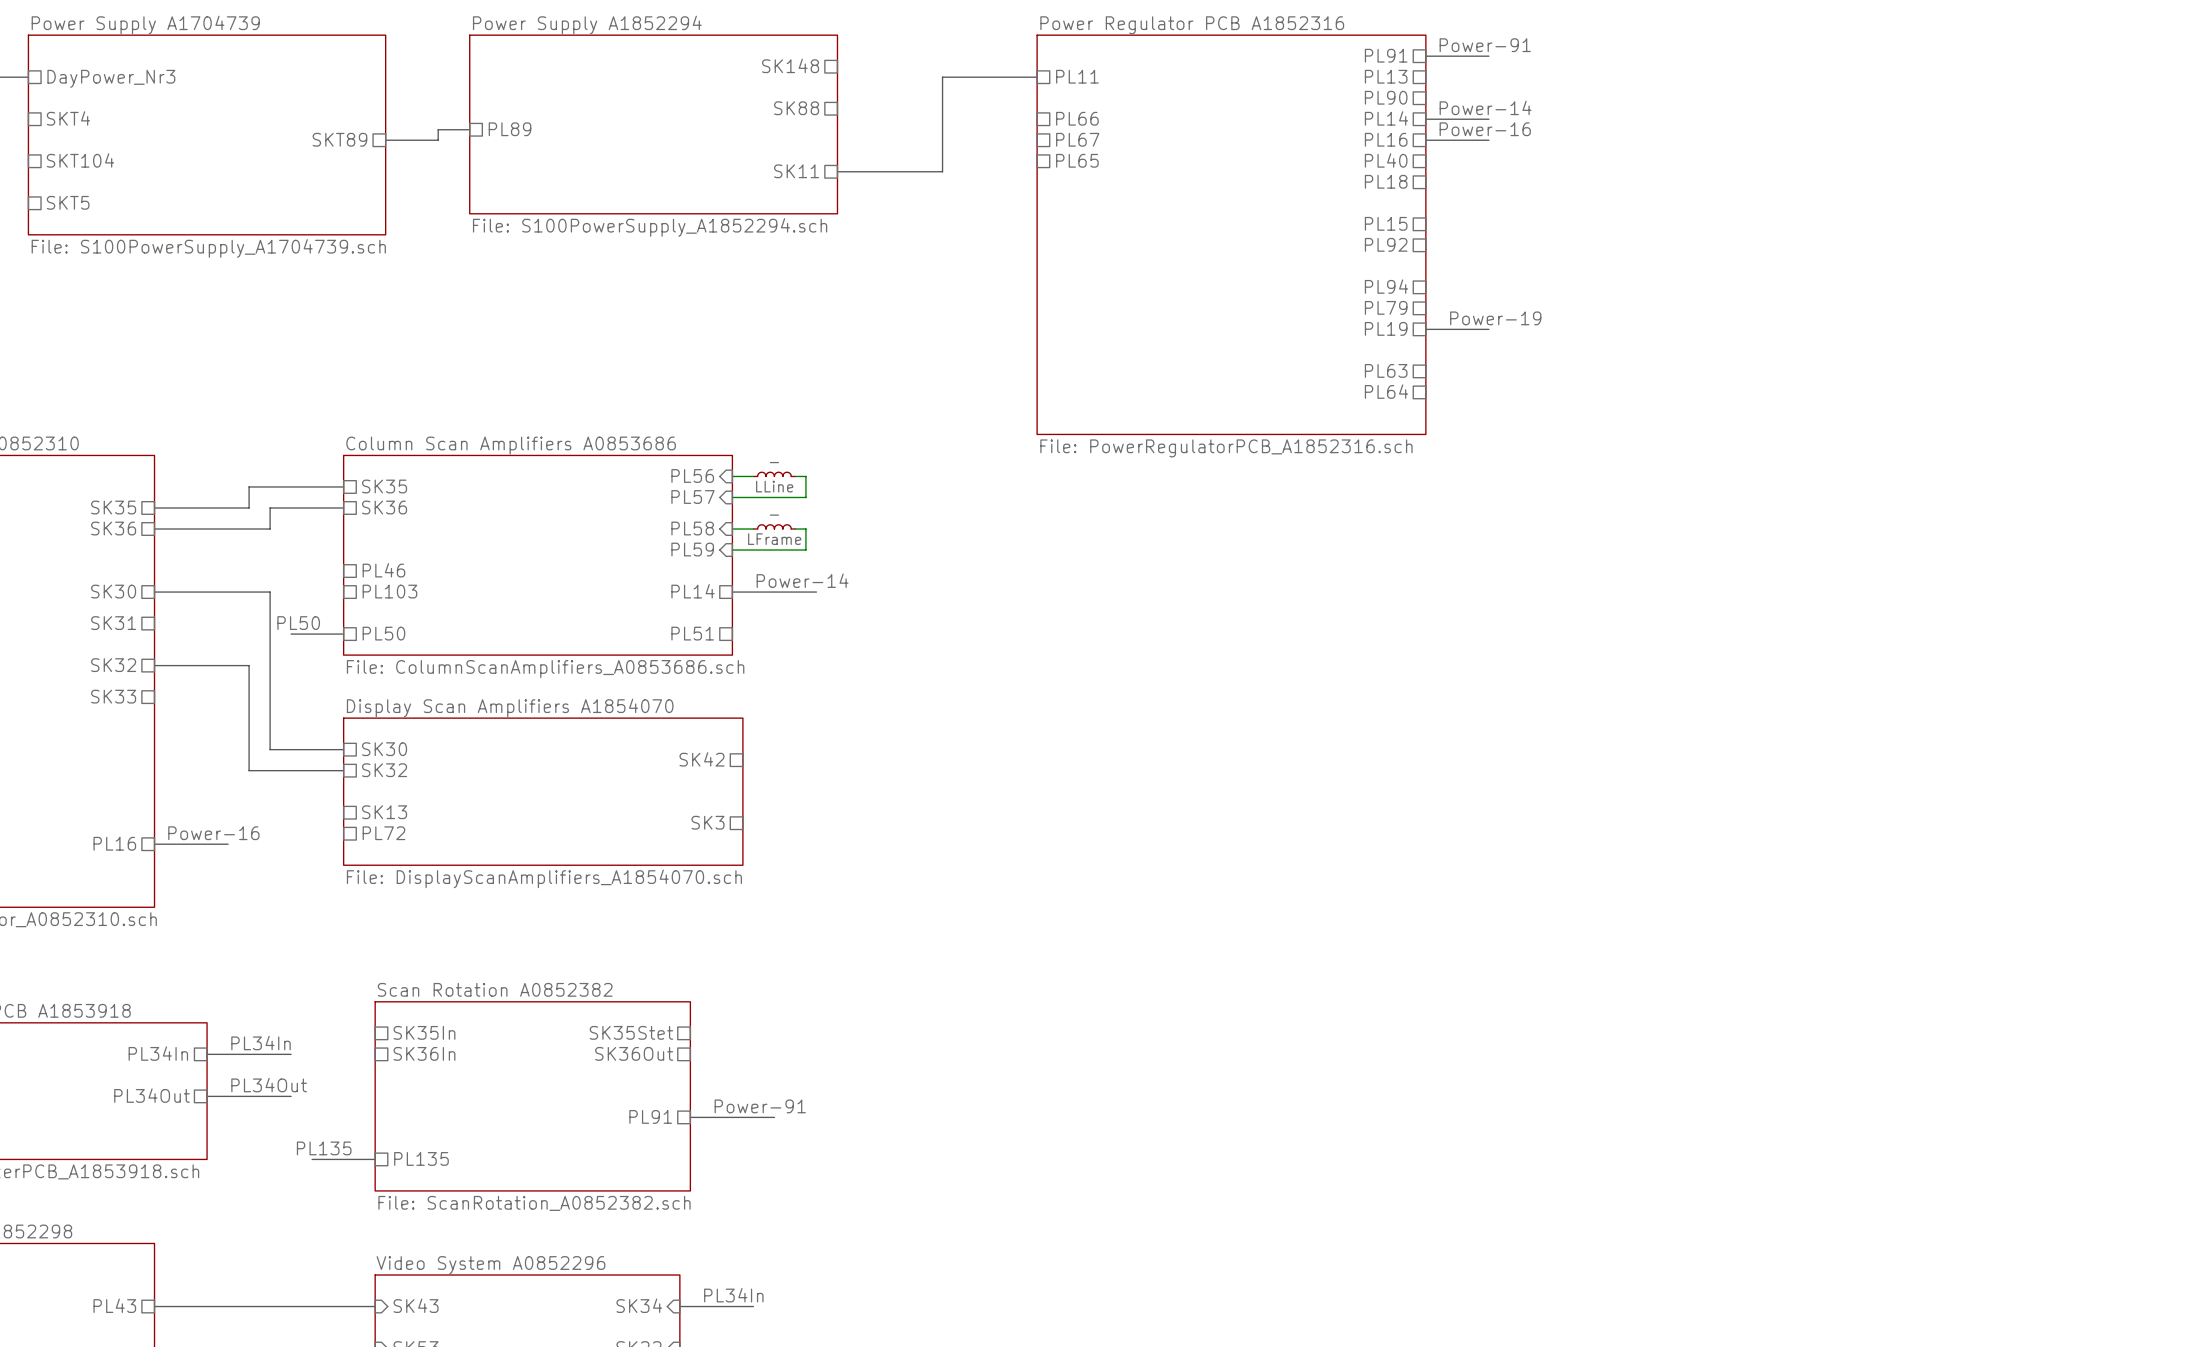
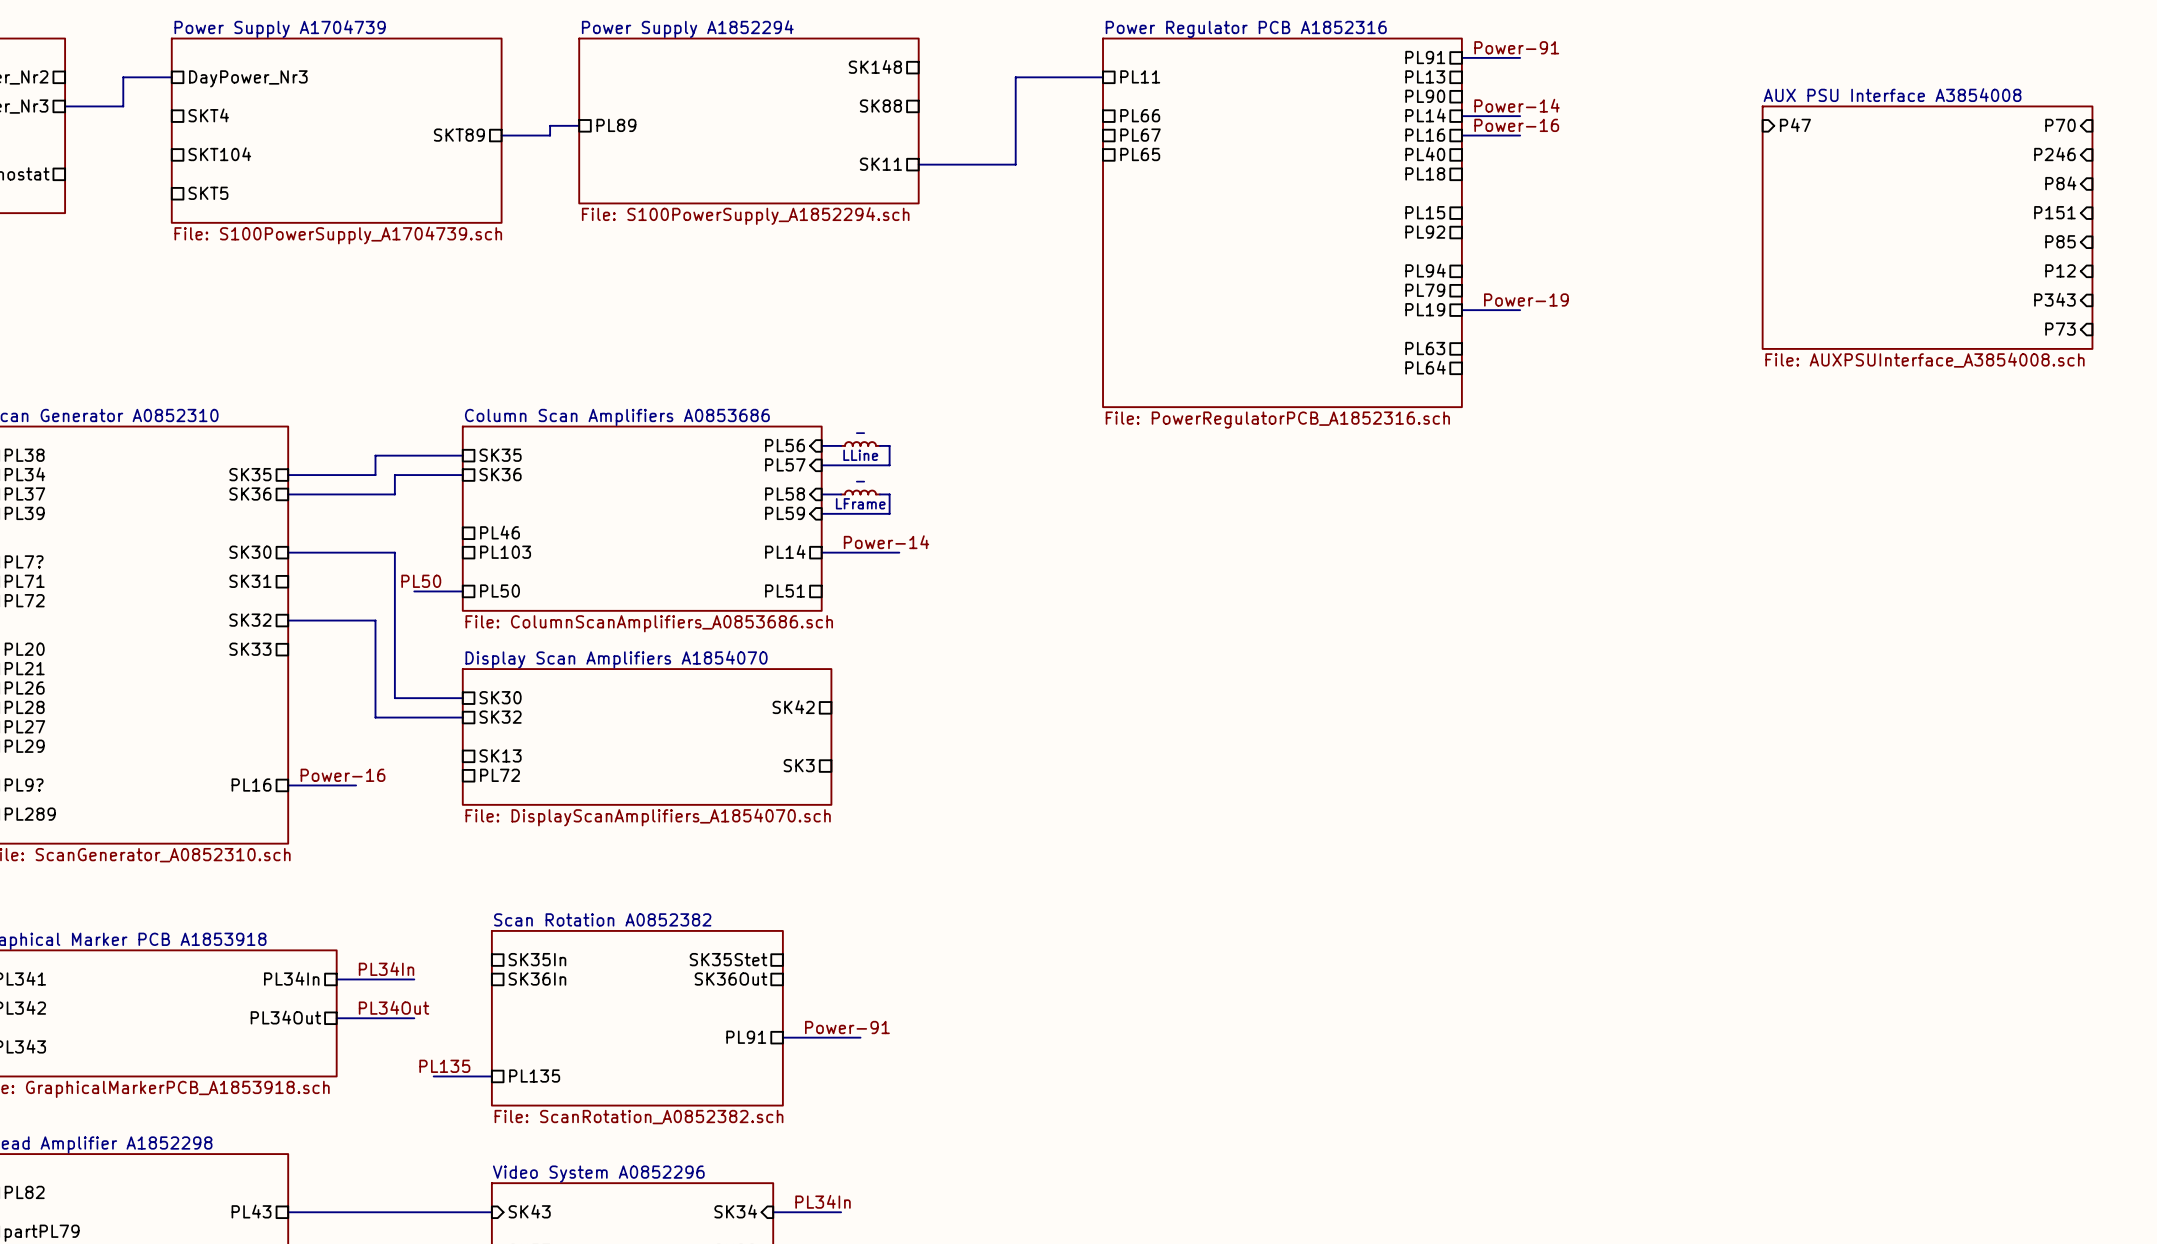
sheet pin: none -> P47 (1795, 125)
sheet pin: none -> P70 (2060, 125)
sheet pin: none -> P246 (2054, 154)
sheet pin: none -> P84 (2060, 183)
sheet pin: none -> P151 (2054, 212)
sheet AUX PSU Interface A3854008: none -> File: AUXPSUInterface_A3854008.sch (1927, 227)
sheet pin: none -> P85 (2060, 241)
sheet pin: none -> P12 (2060, 270)
sheet pin: none -> P343 (2054, 299)
sheet pin: none -> P73 (2060, 329)

